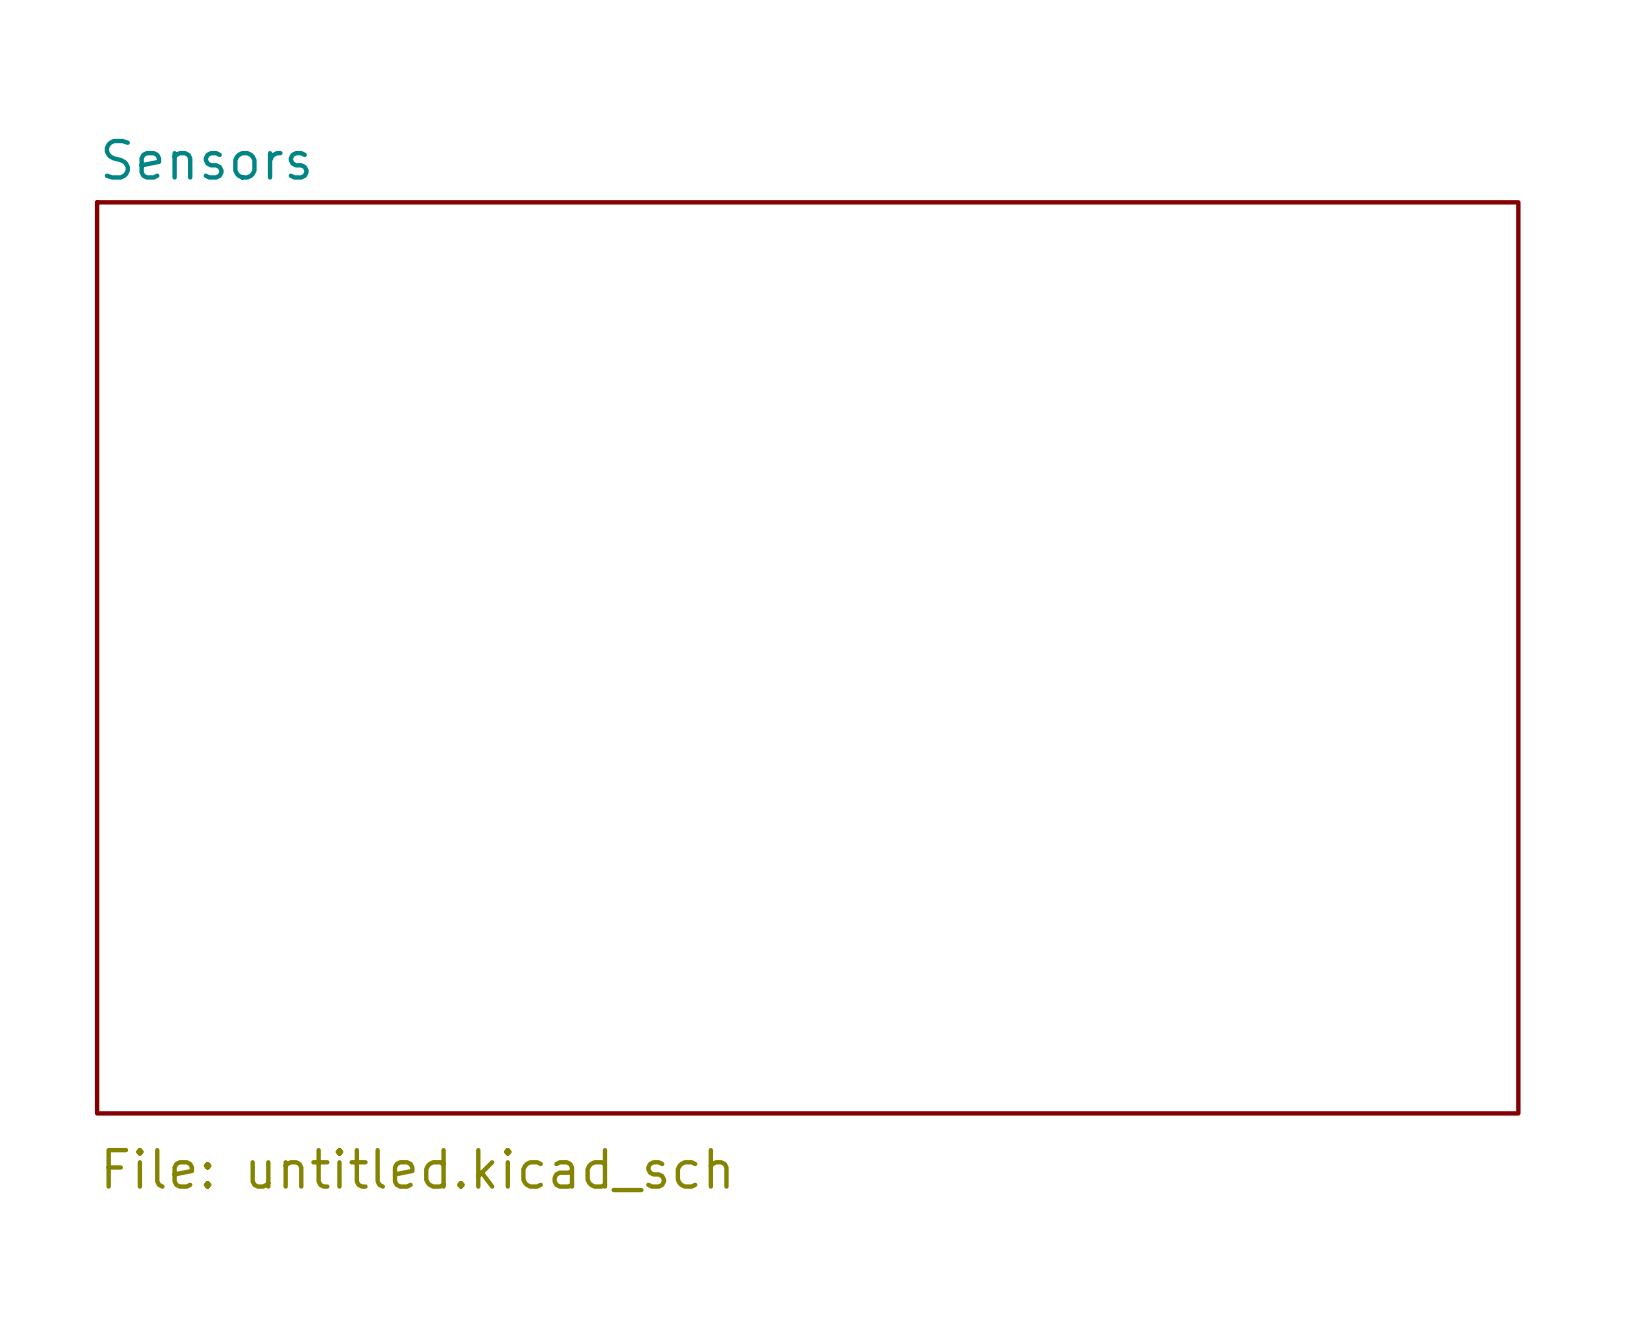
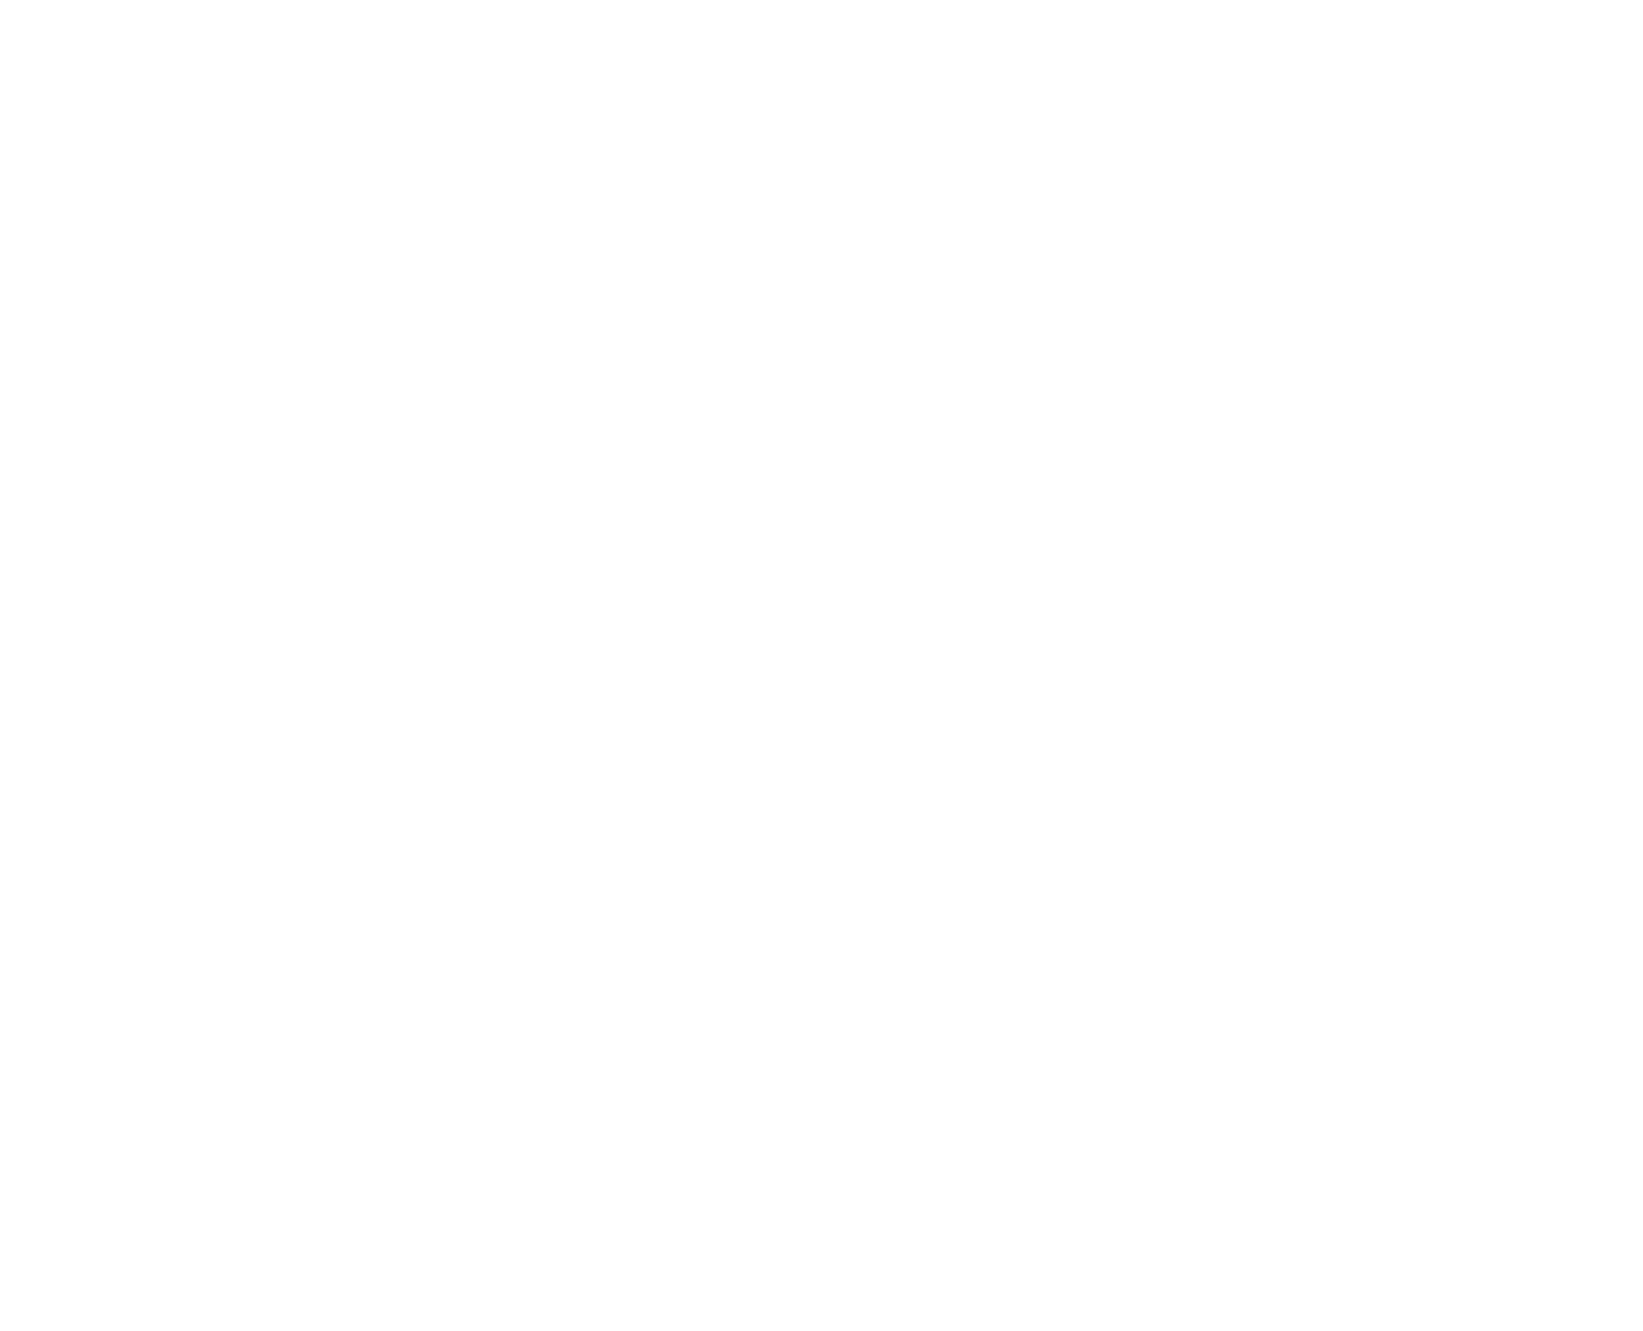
sheet Sensors: File: untitled.kicad_sch (807, 657) -> none

